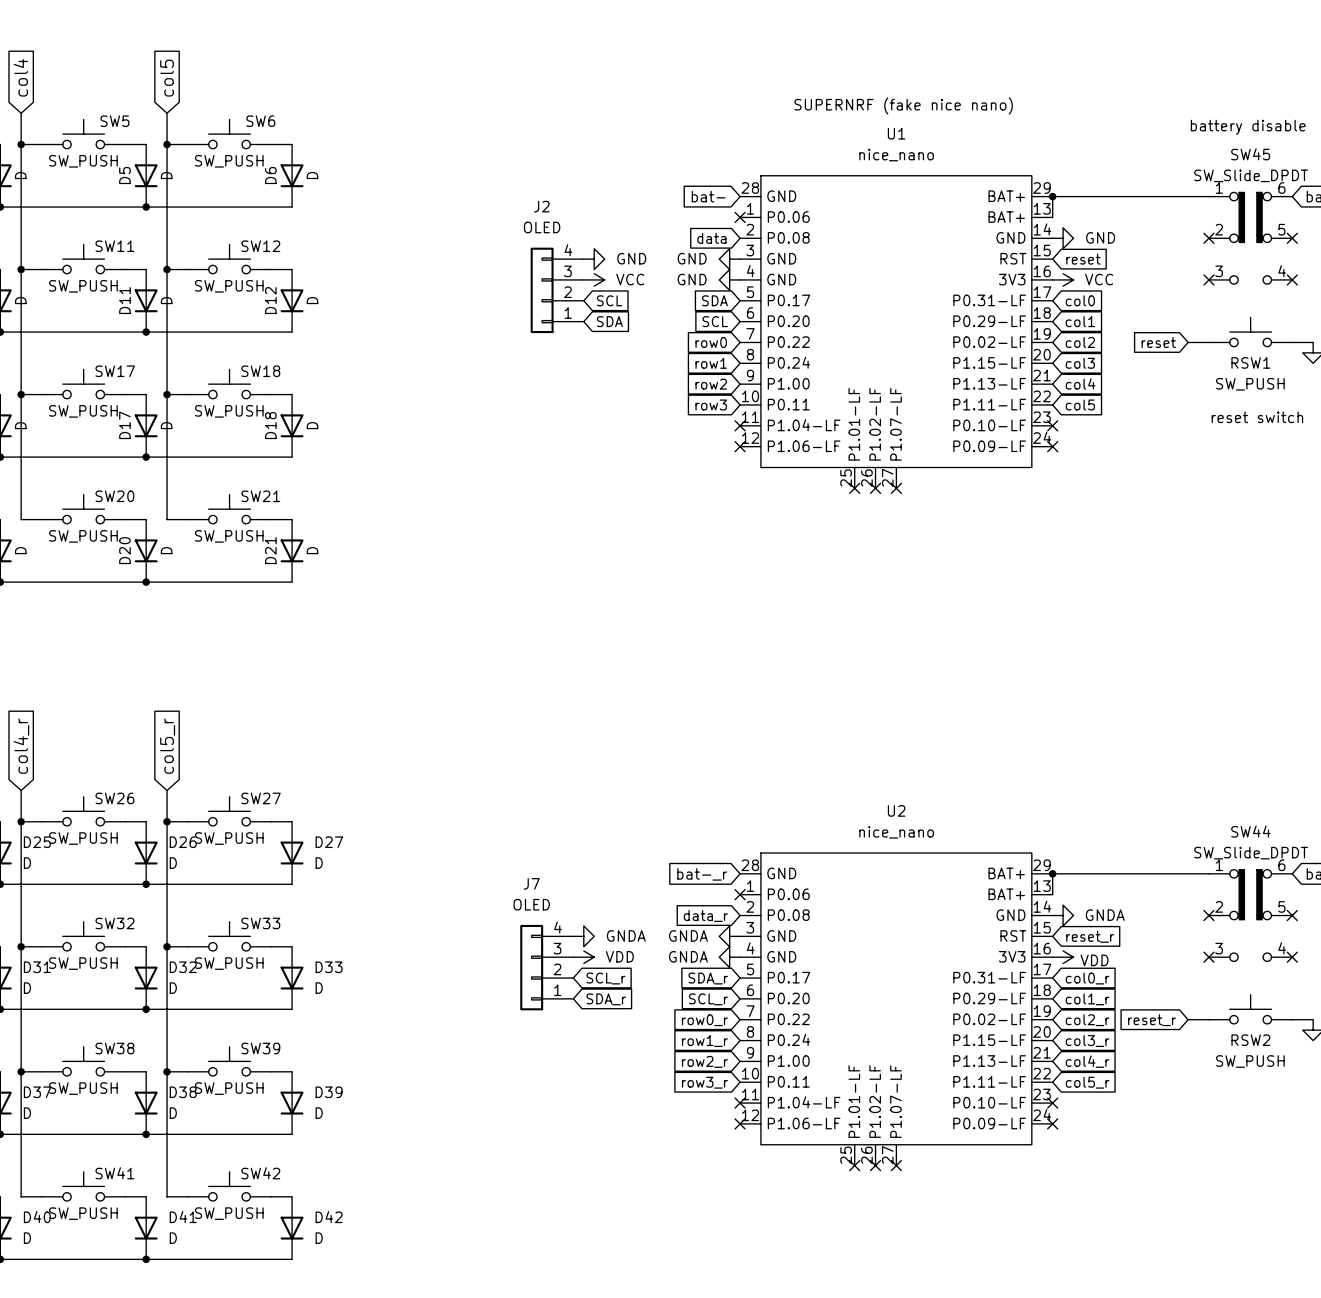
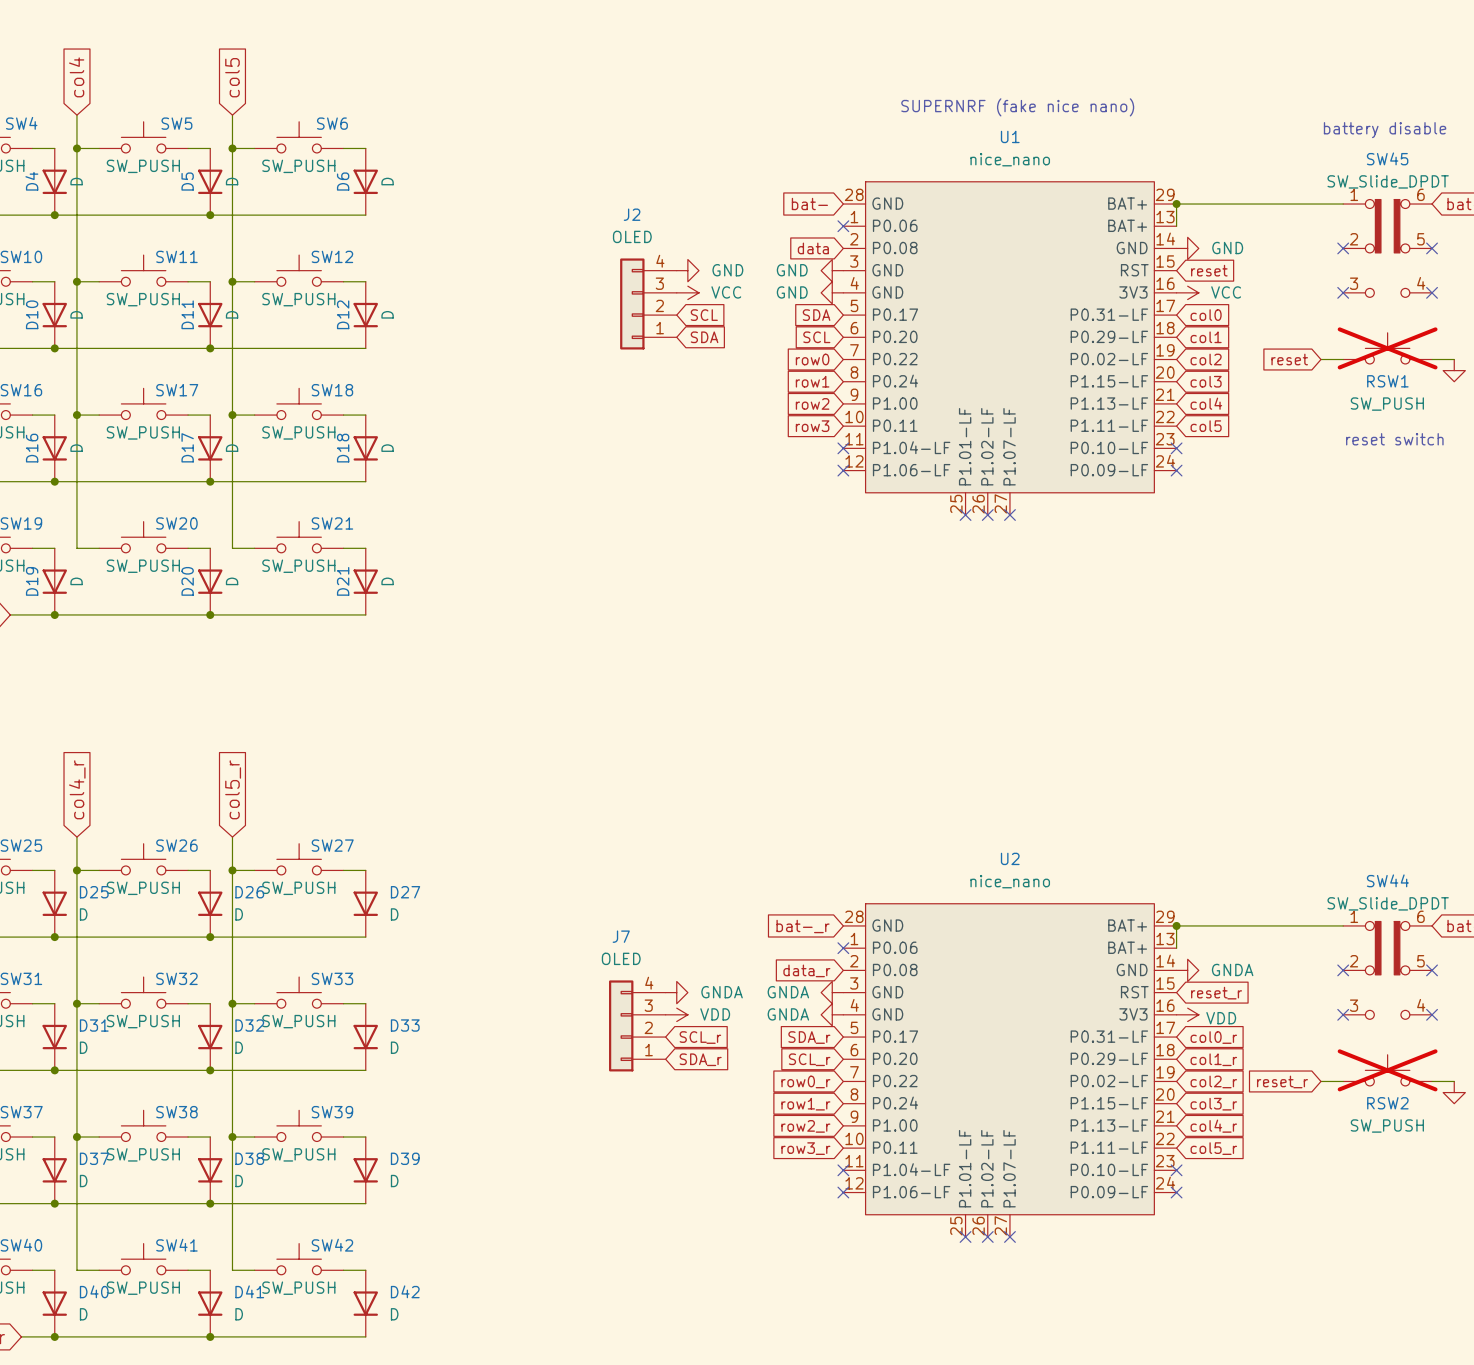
RSW1 do-not-place cross: none -> (1387, 348)
RSW2 do-not-place cross: none -> (1387, 1070)

